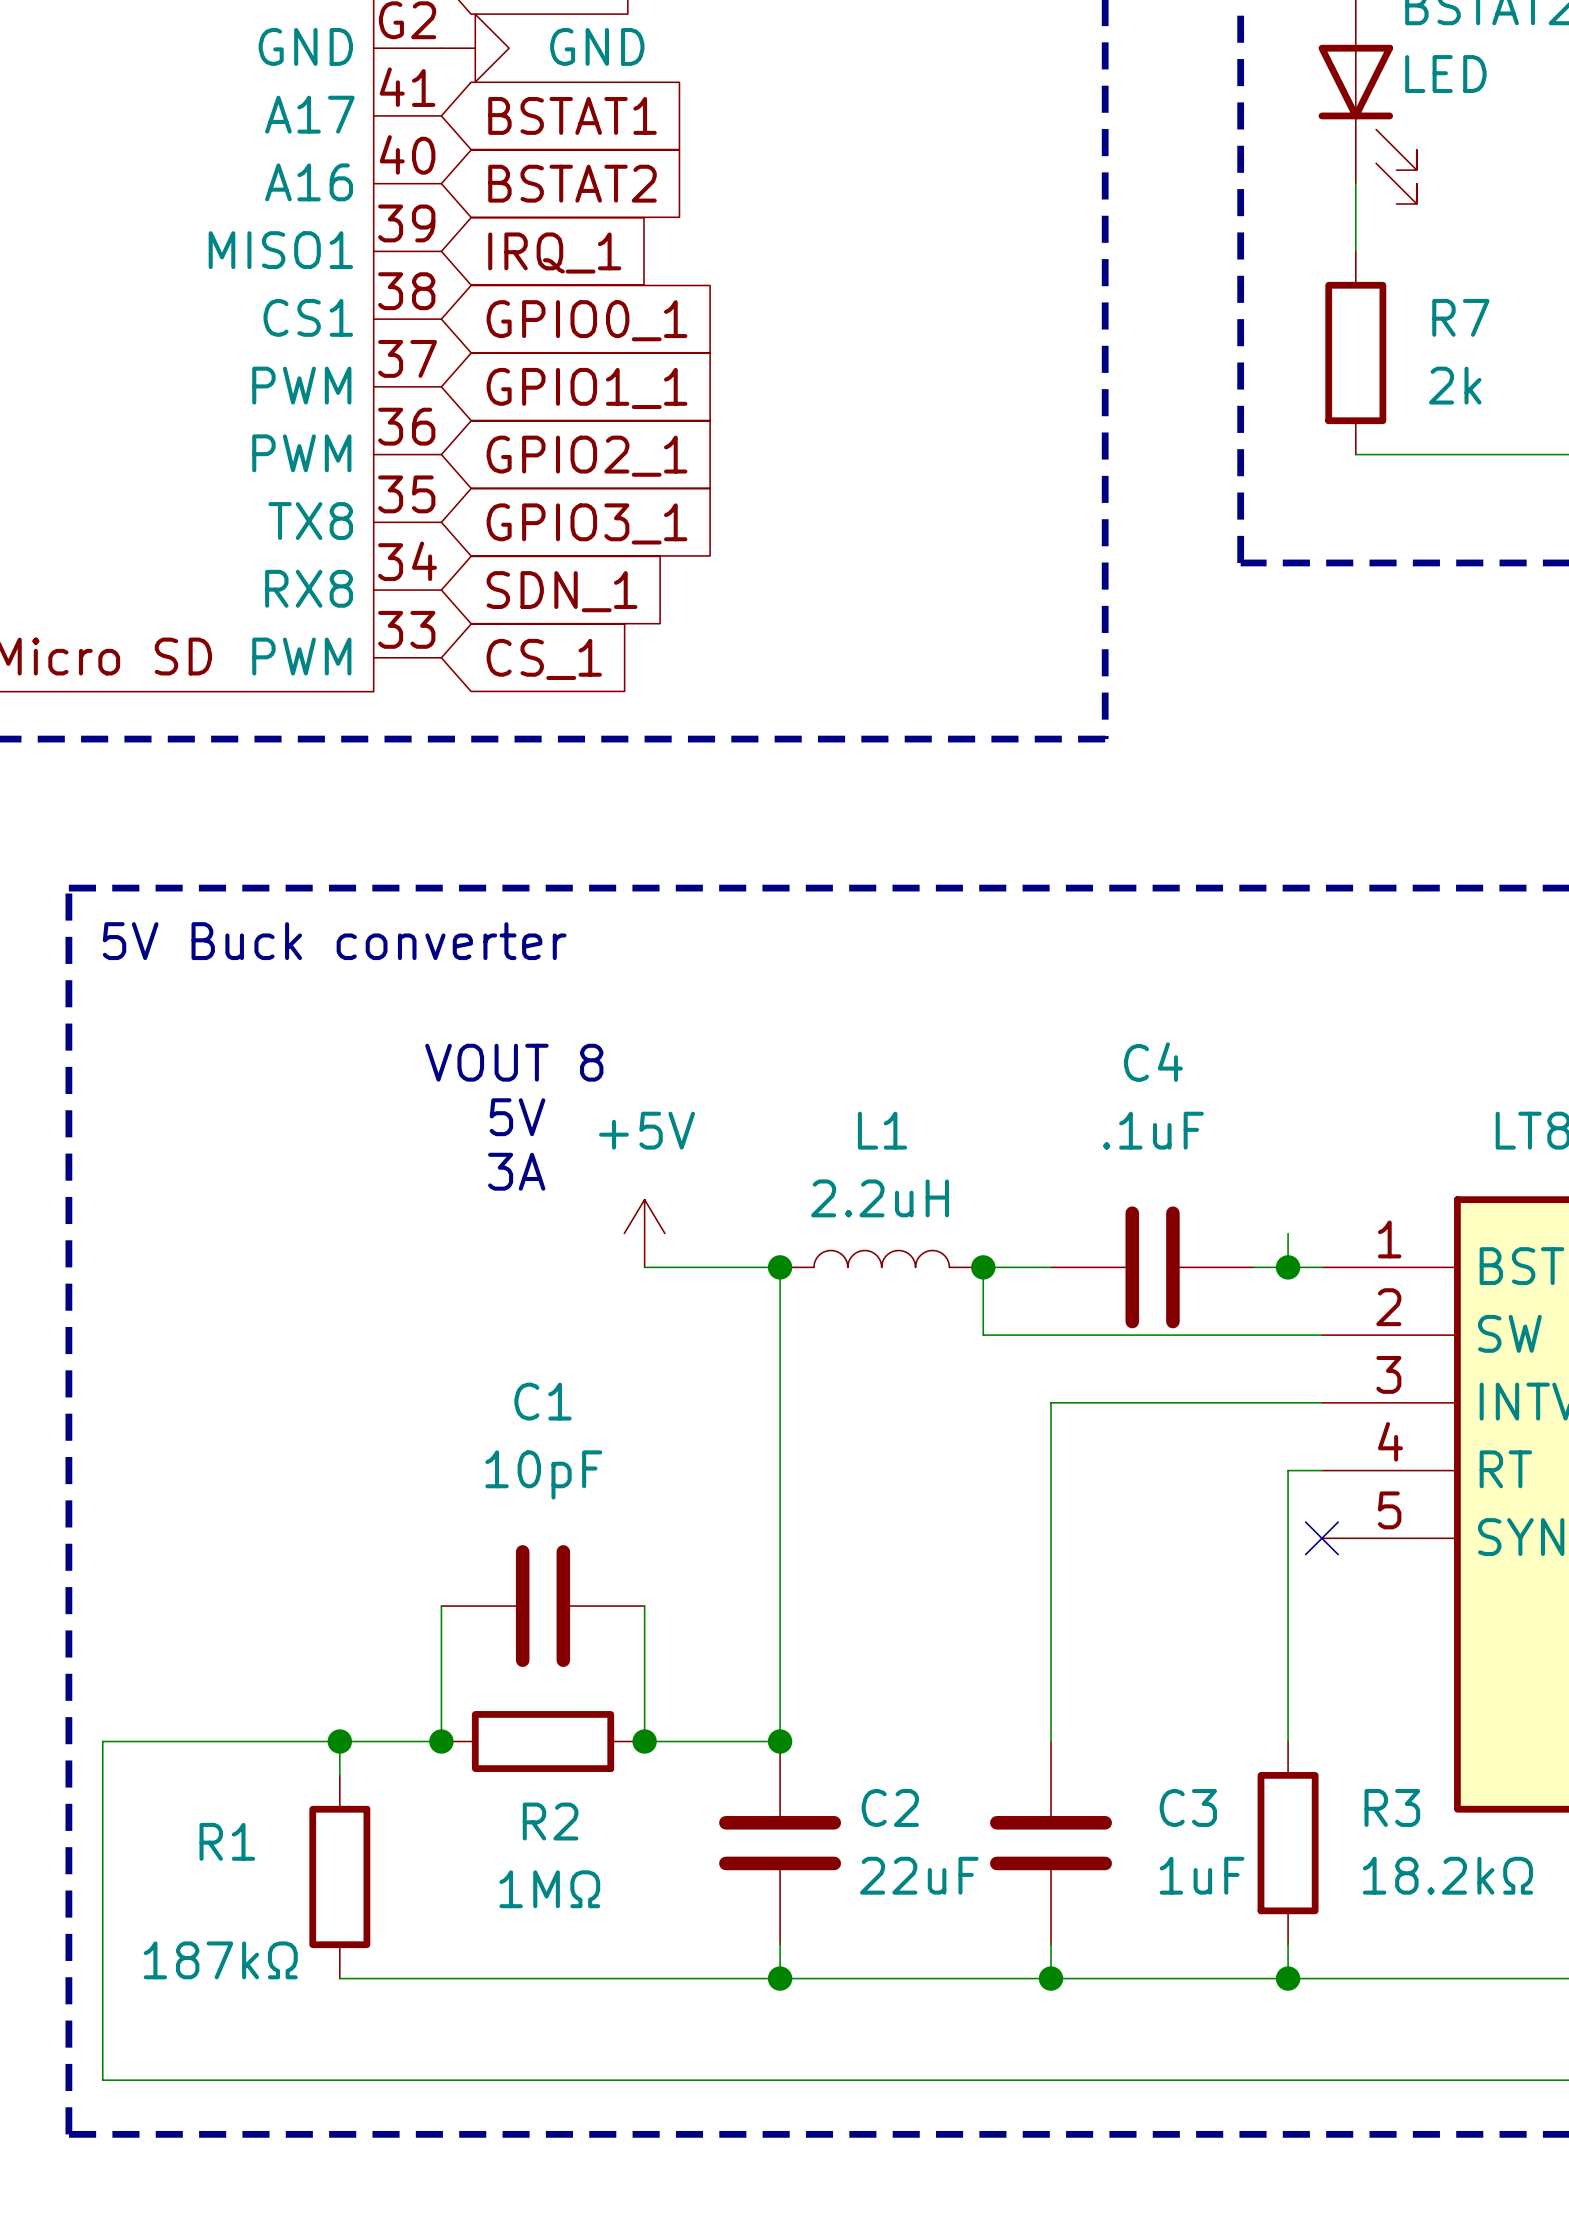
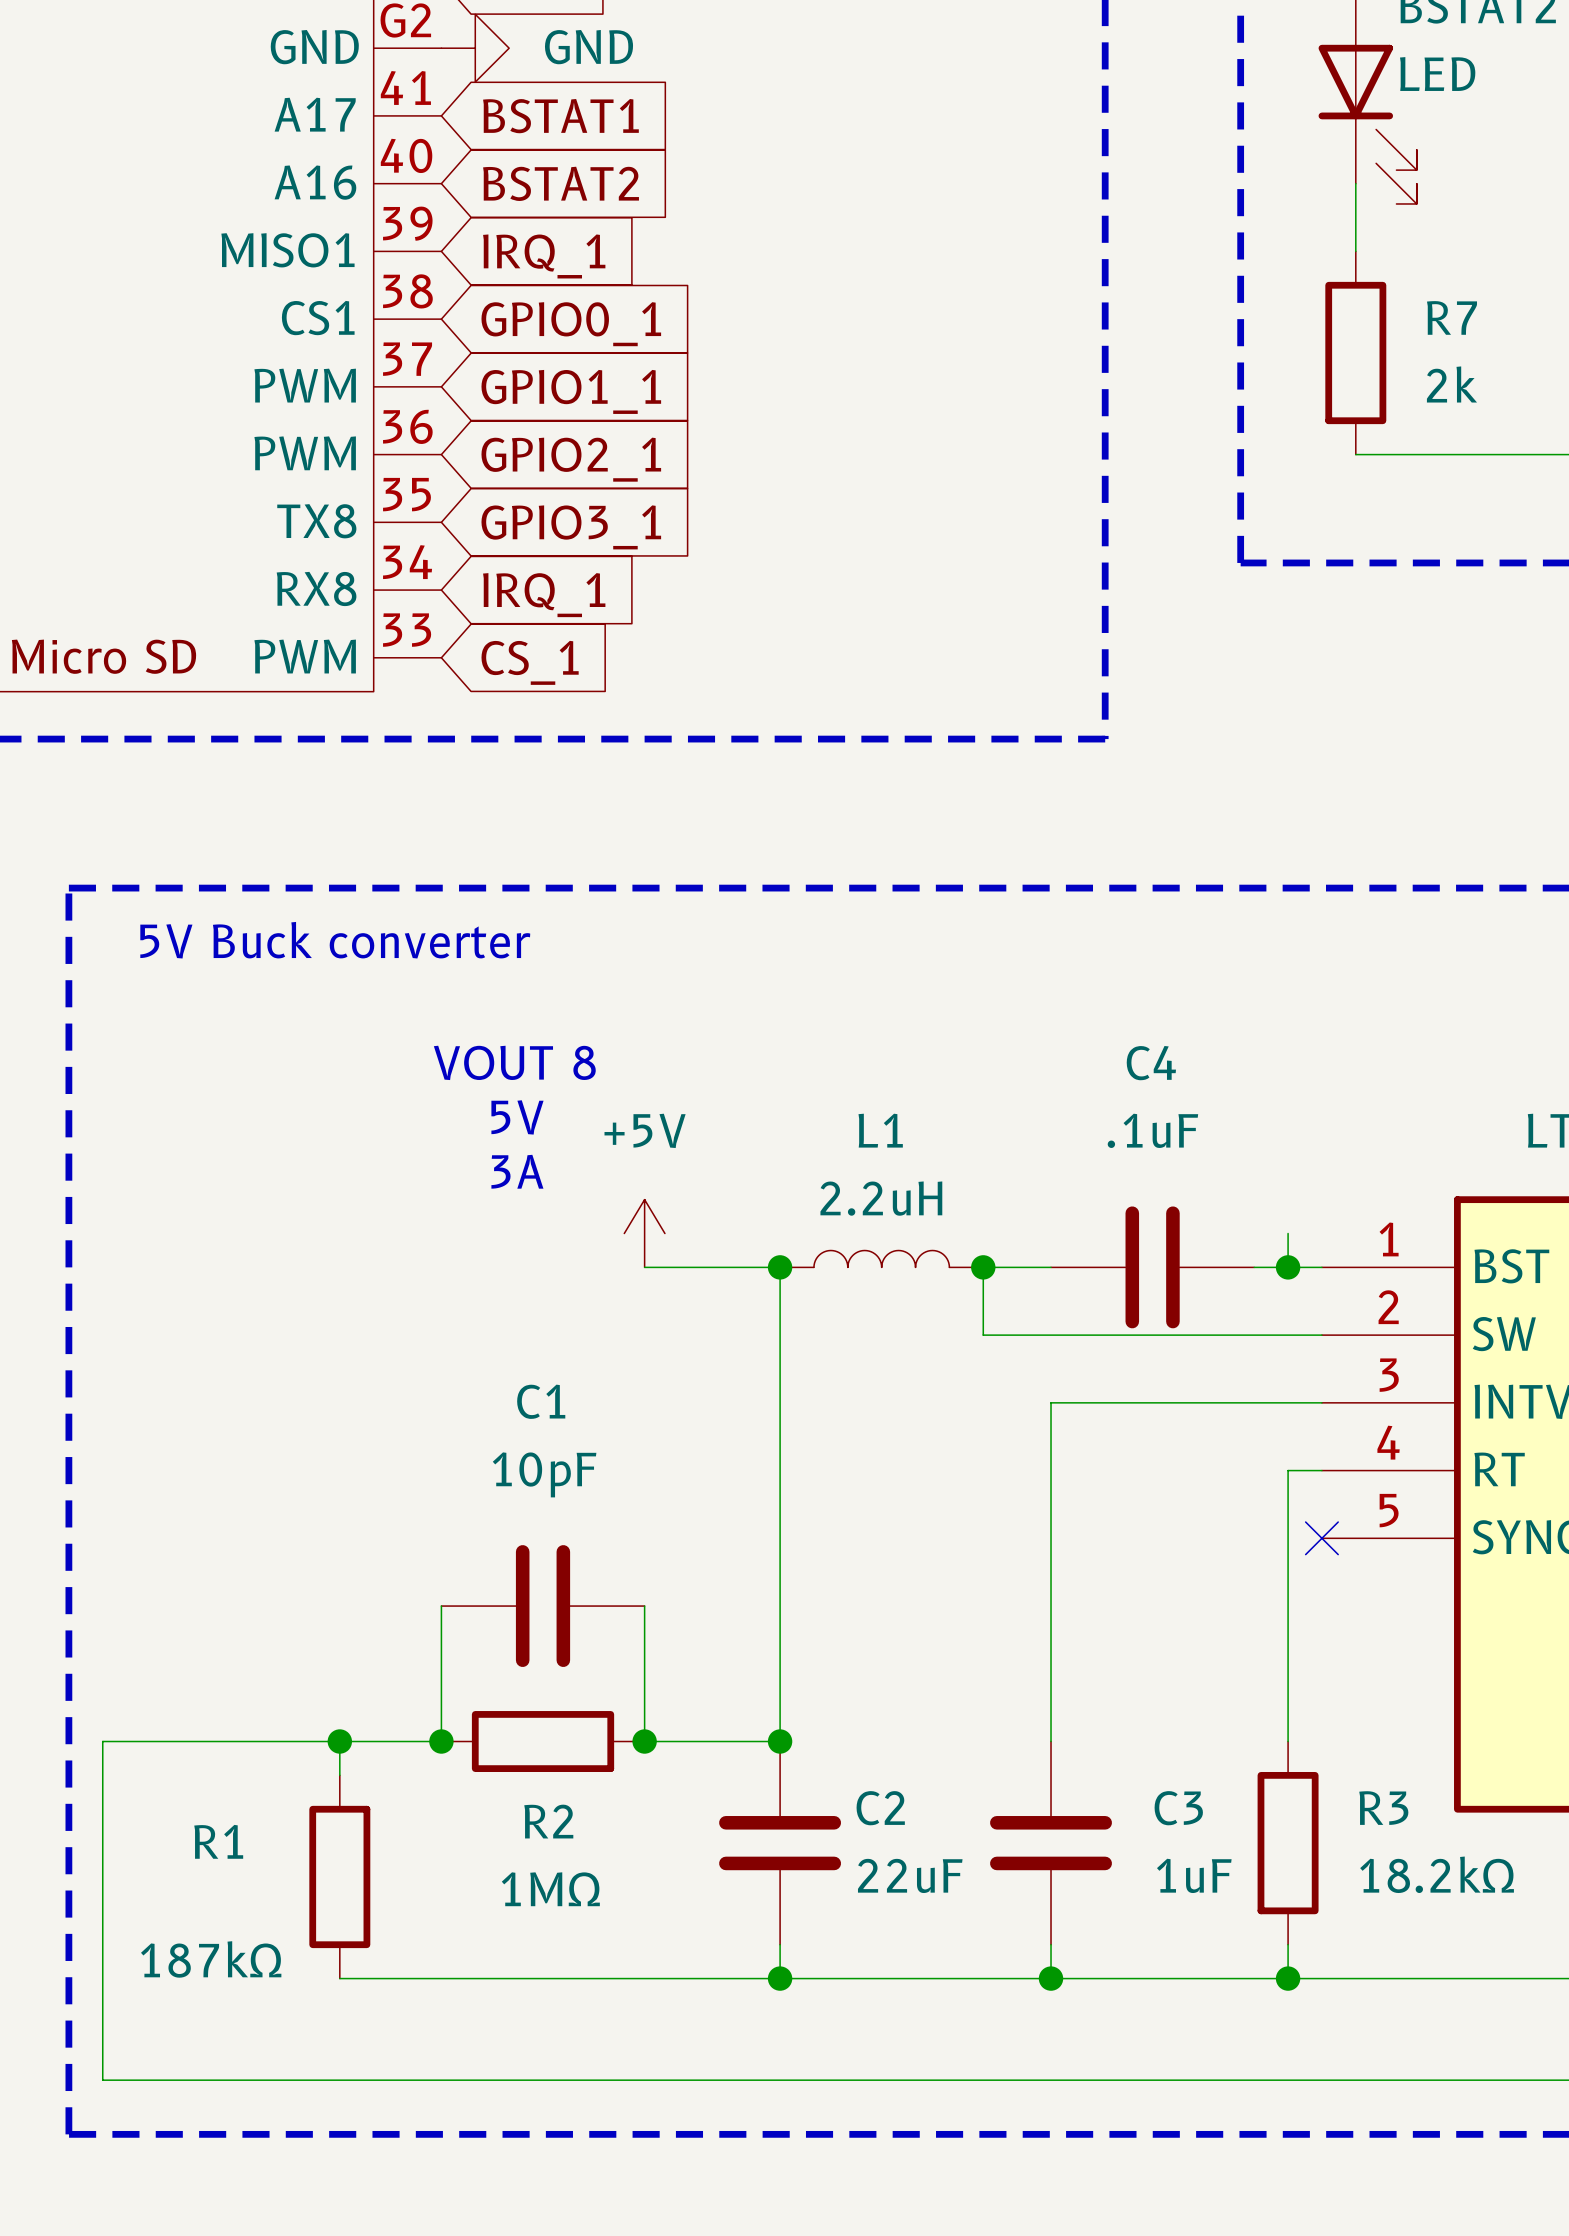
global label: SDN_1 (562, 591) -> IRQ_1 (544, 595)

